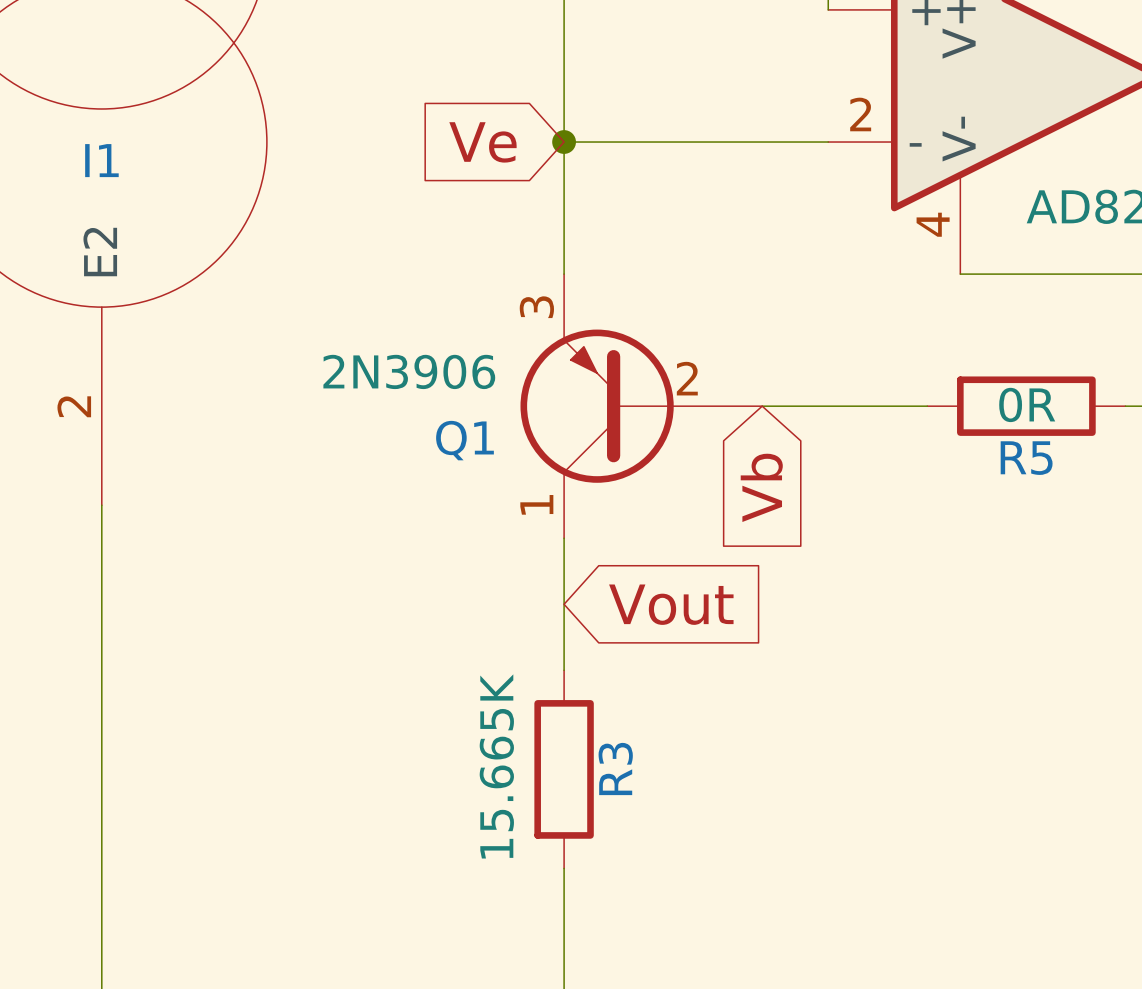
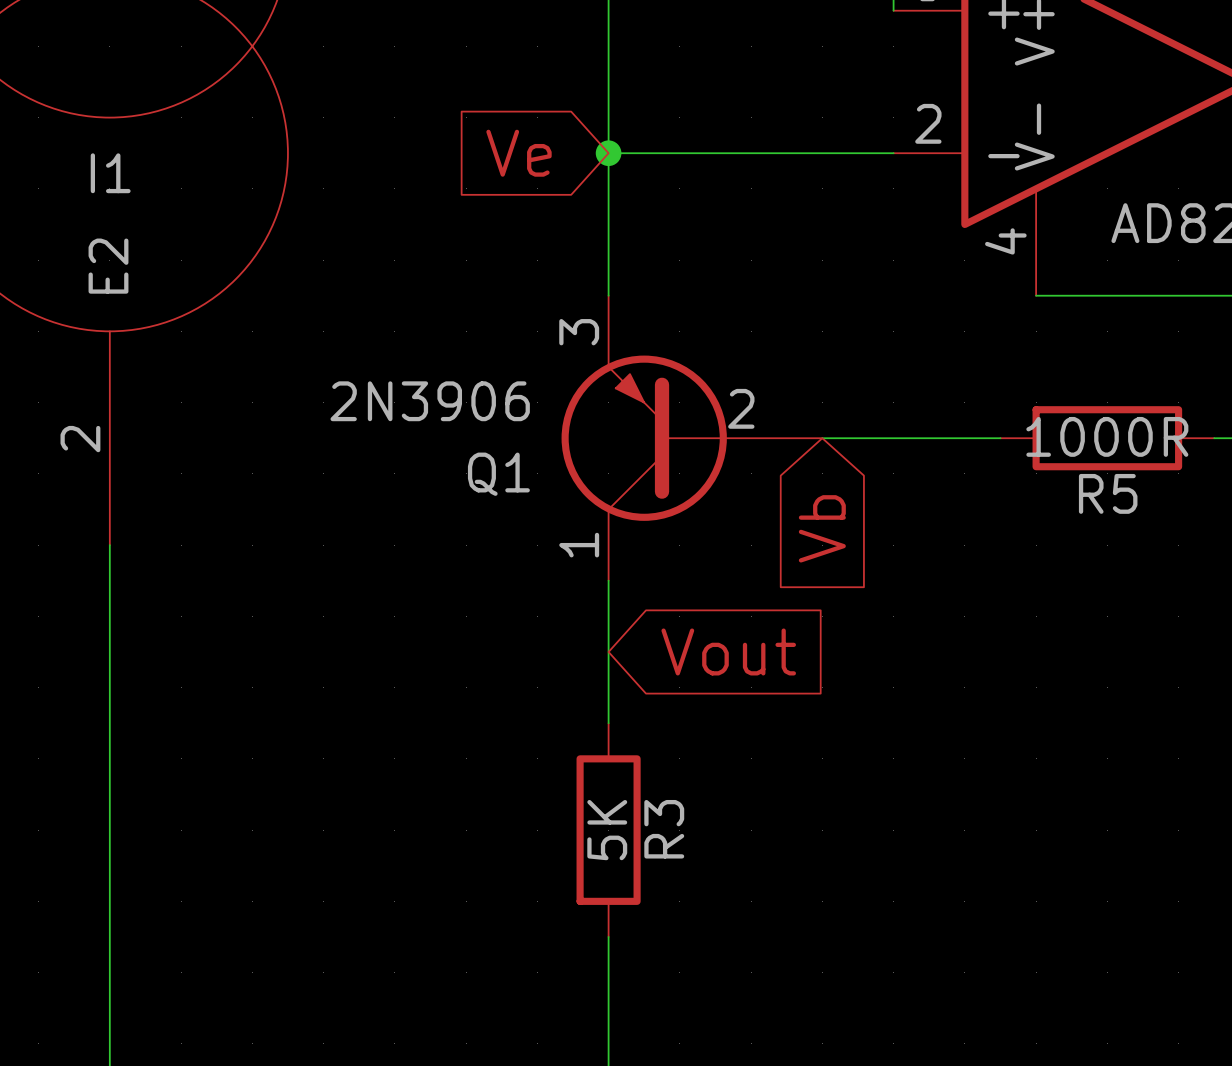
R5 value: 0R (1027, 404) -> 1000R (1107, 436)
R3 value: 15.665K (496, 766) -> 5K (607, 830)

